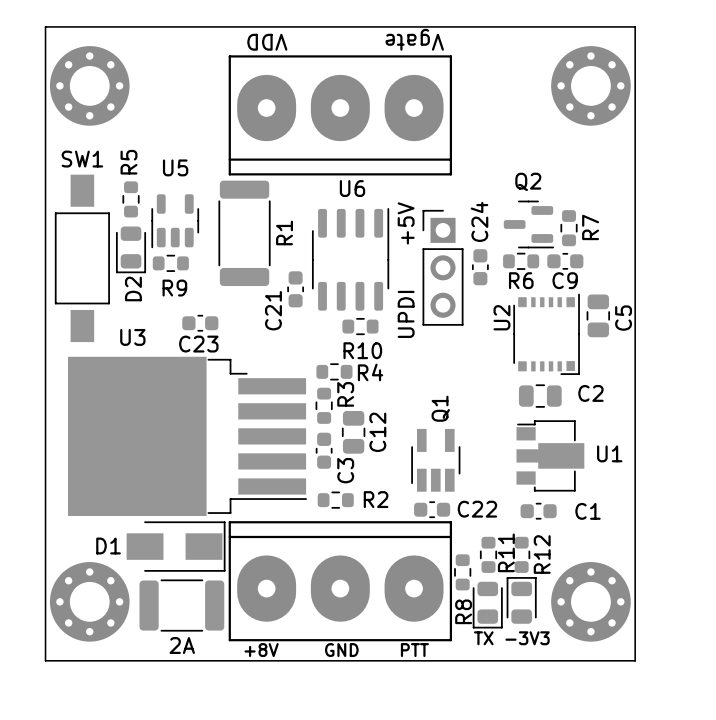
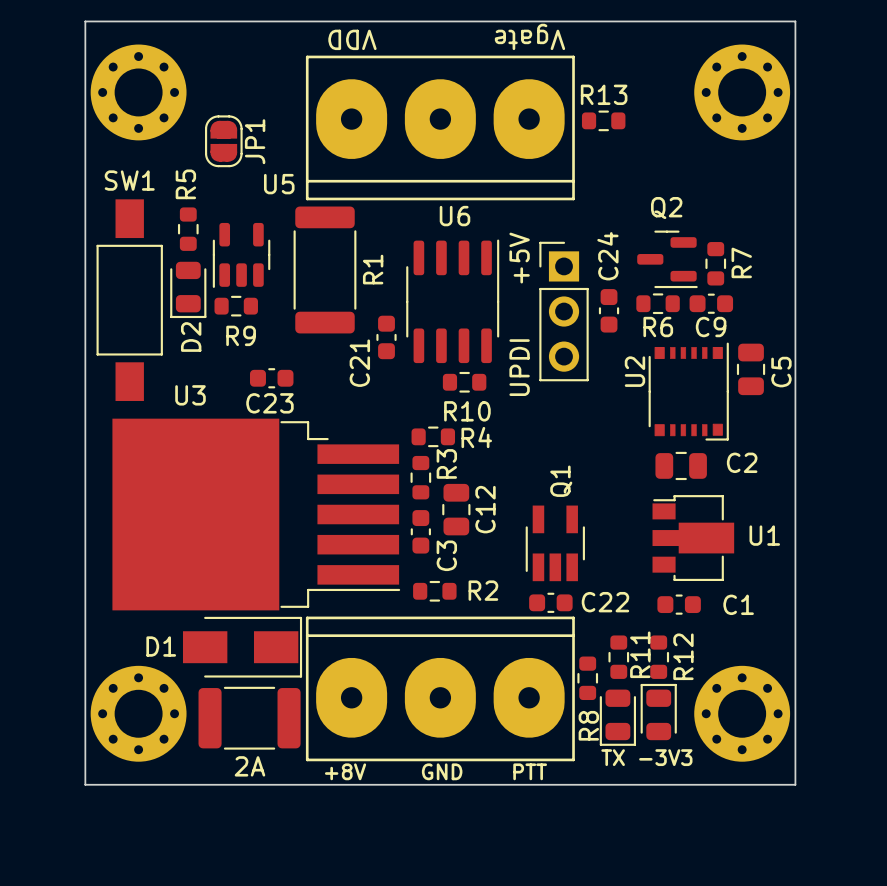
R13: none -> (603, 120)
JP1: none -> (223, 141)
U5 name position: U5 (175, 167) -> U5 (279, 184)

